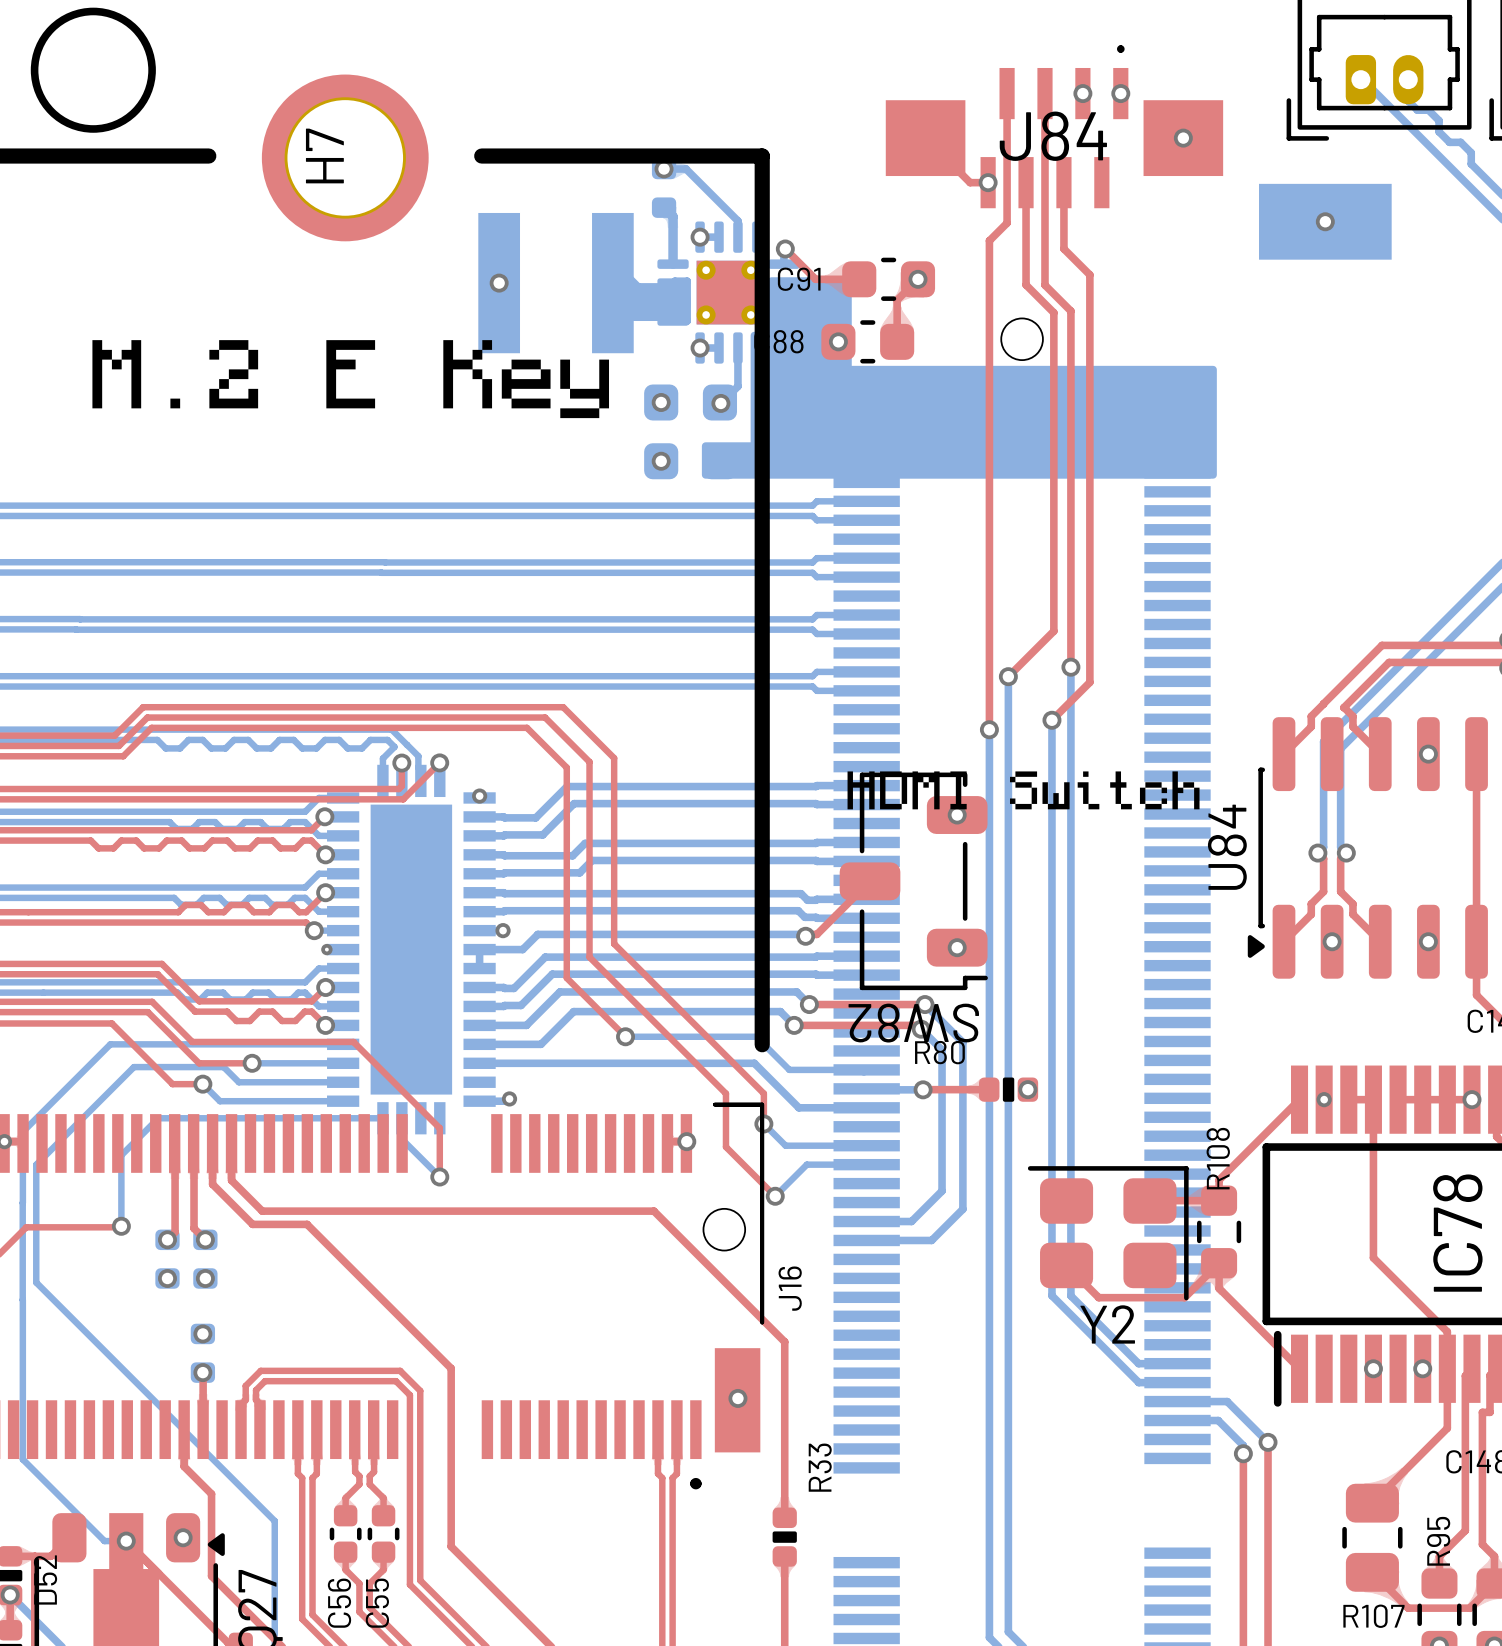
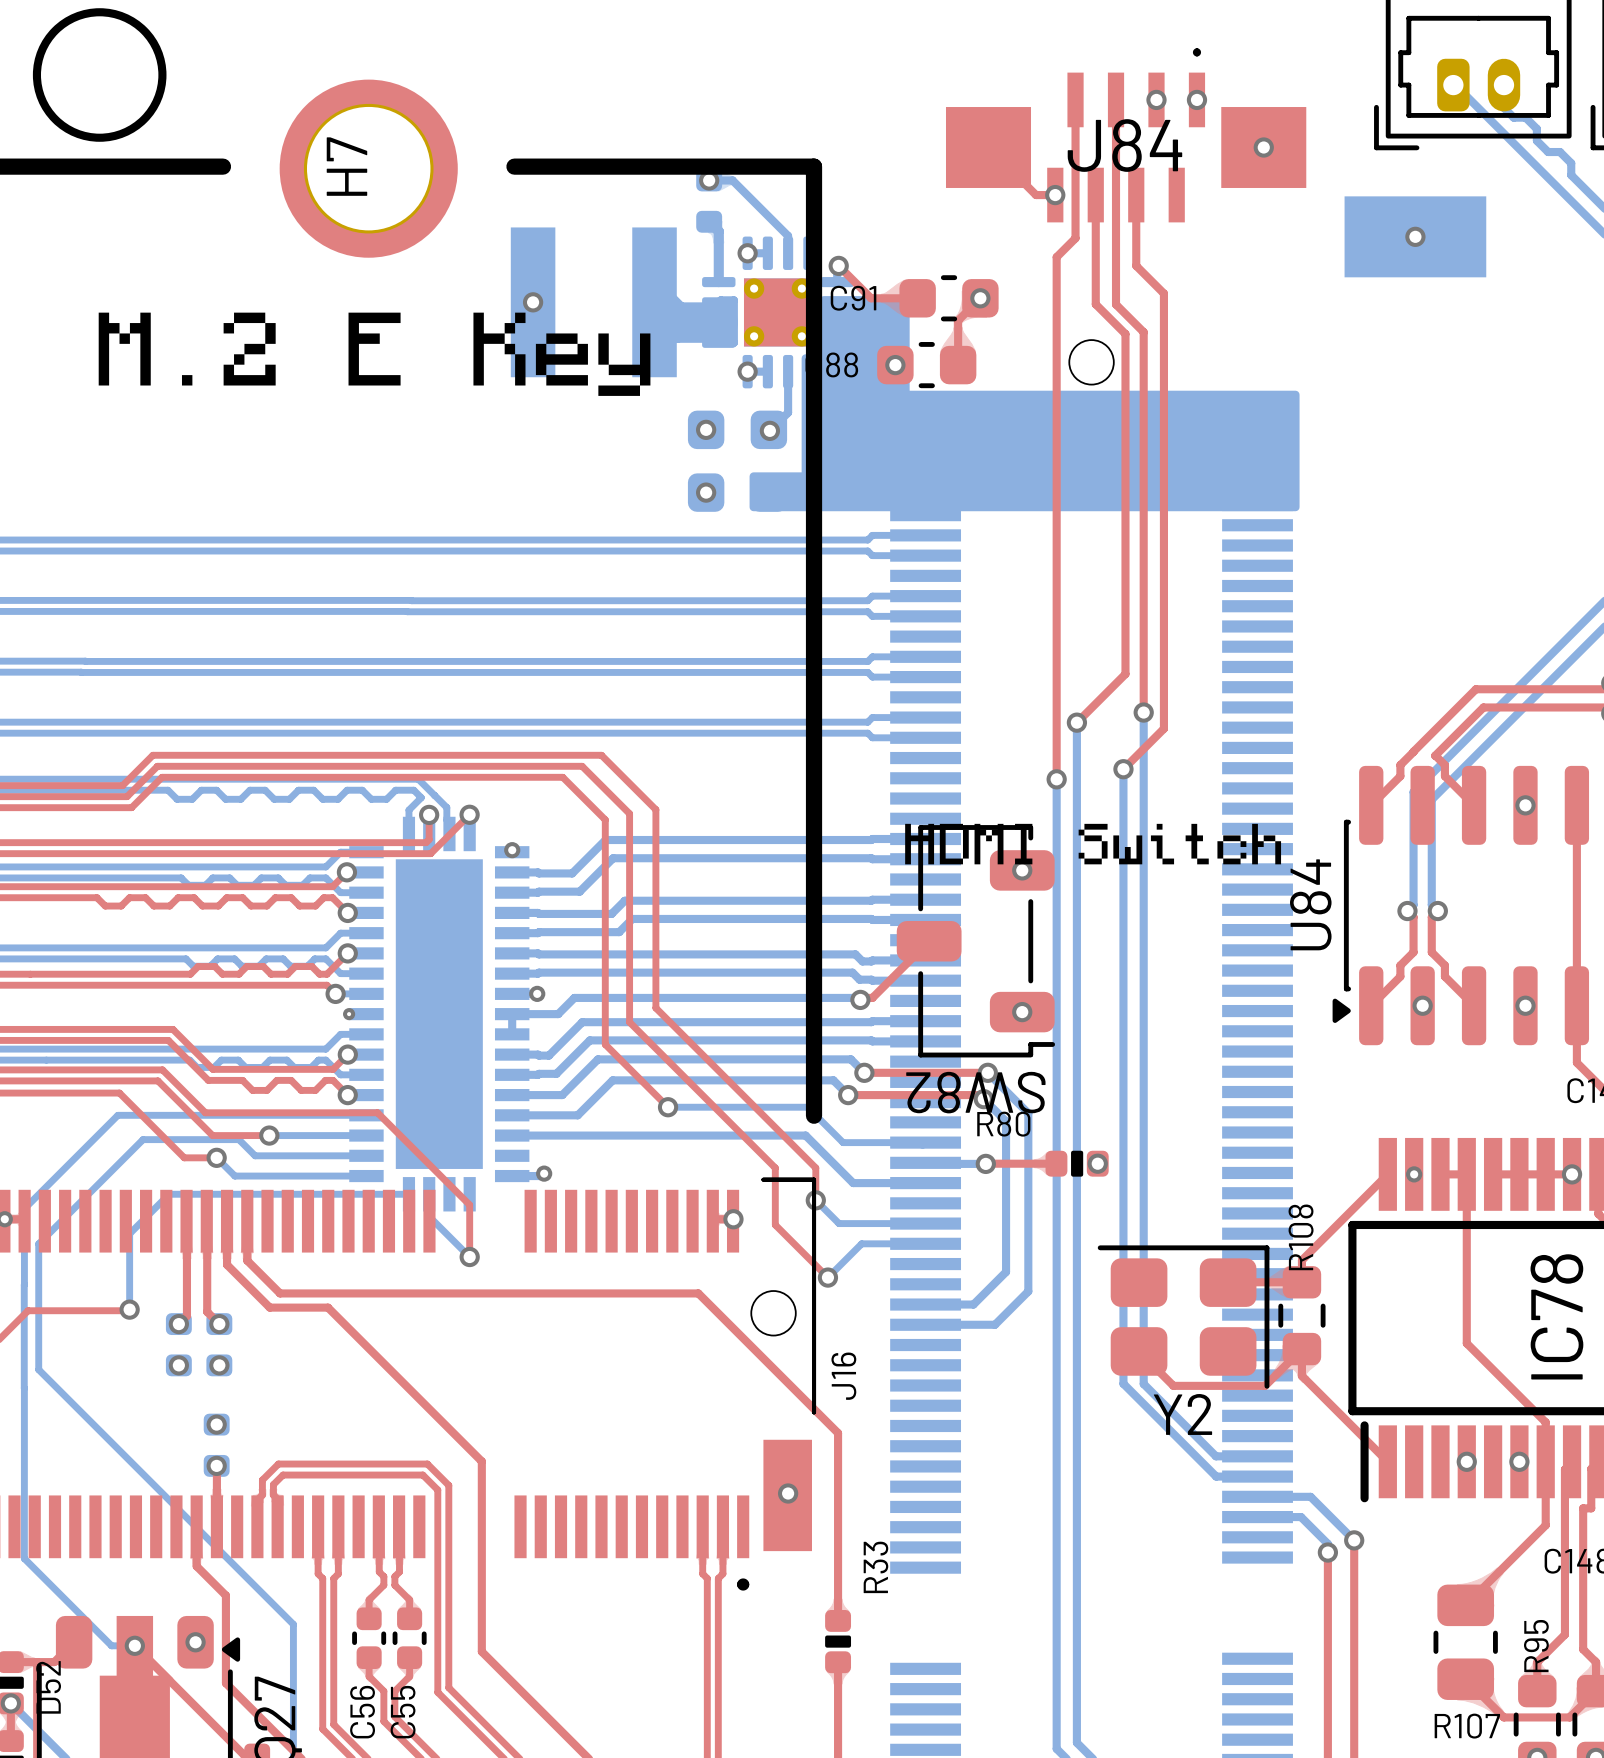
drawing position: (350, 379) -> (374, 354)

